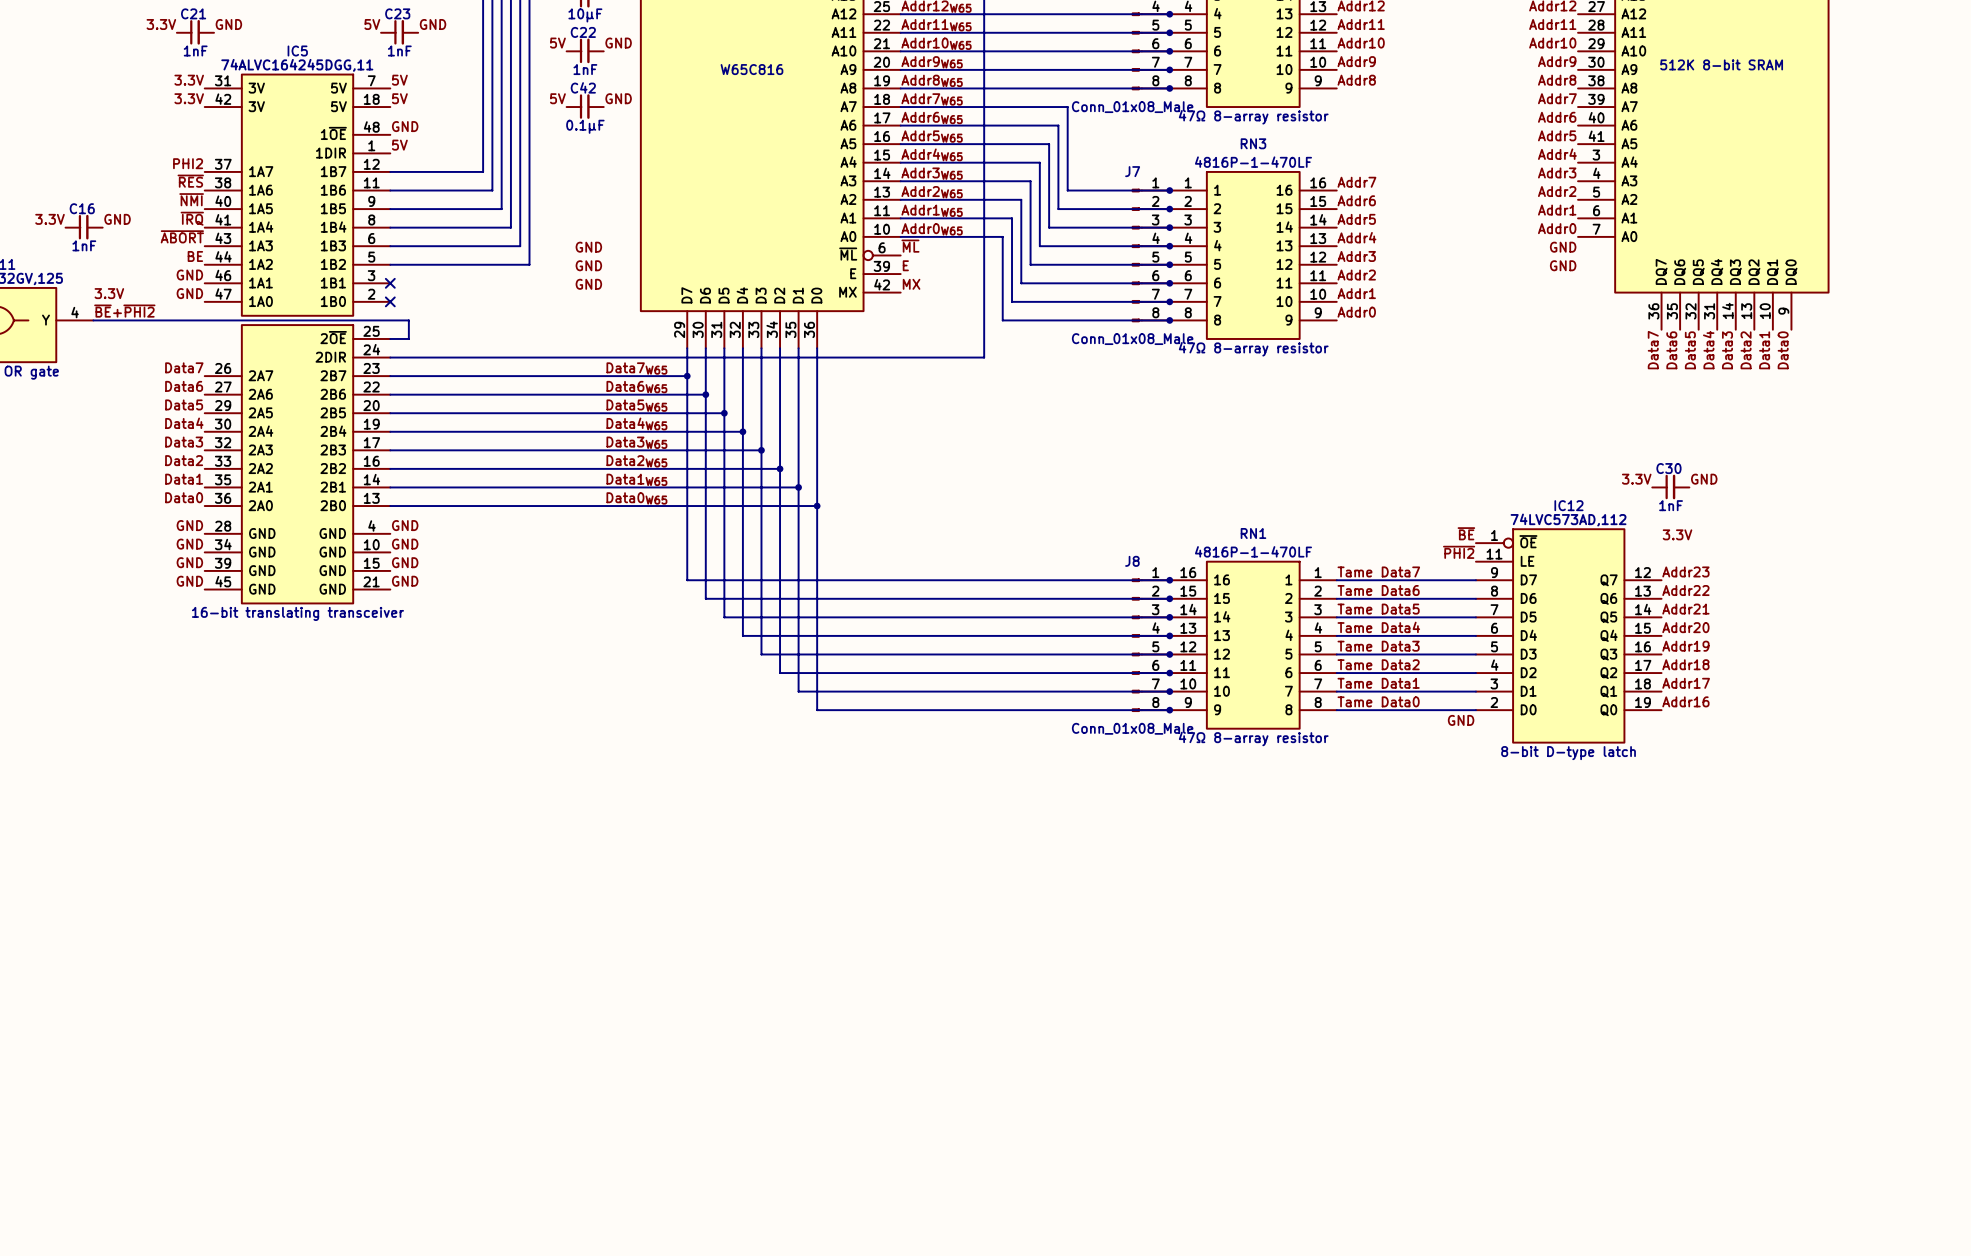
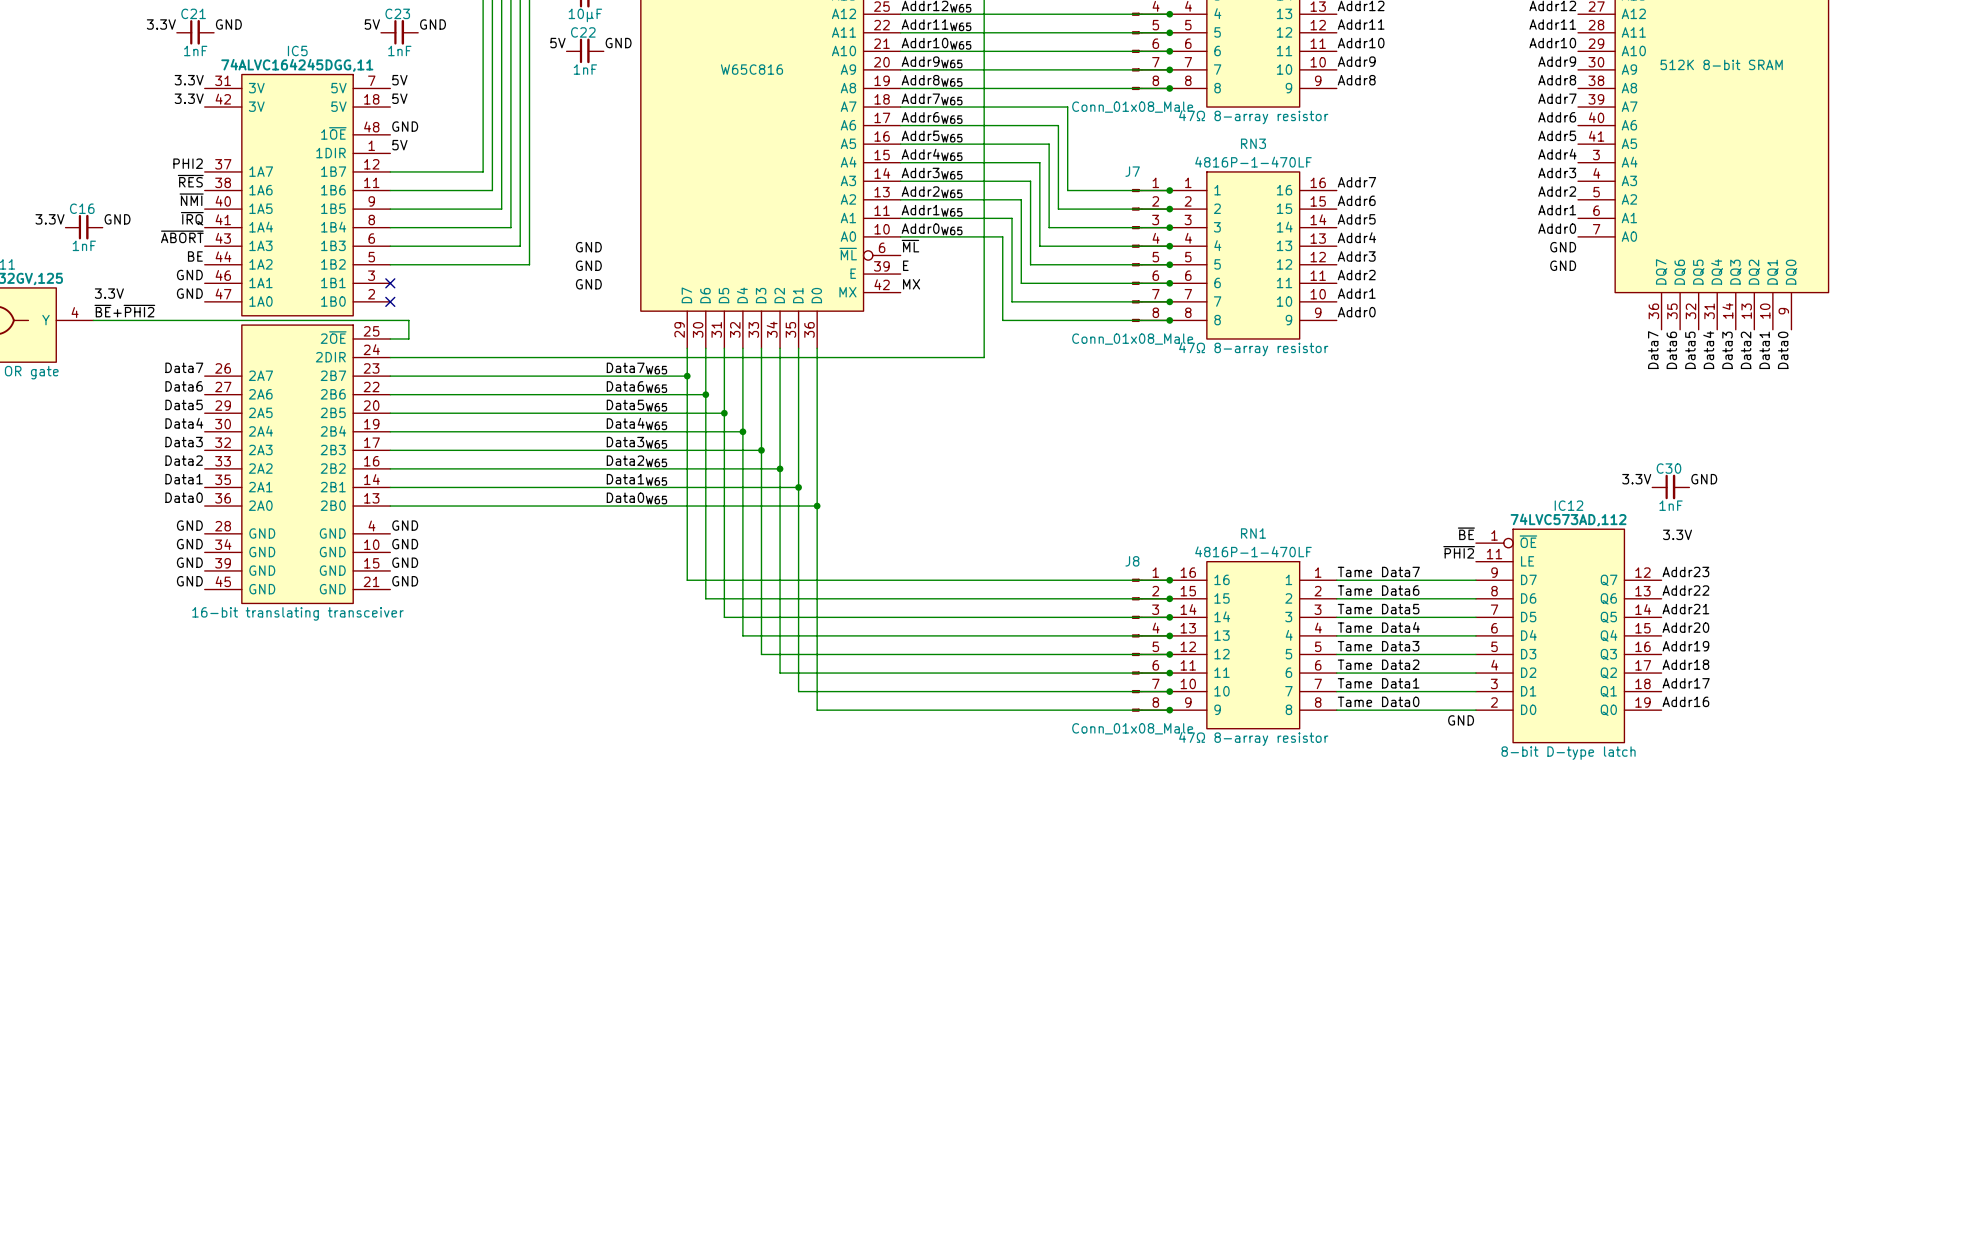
label: 5V (557, 98) -> none
label: GND (618, 98) -> none
C42: (585, 106) -> none

